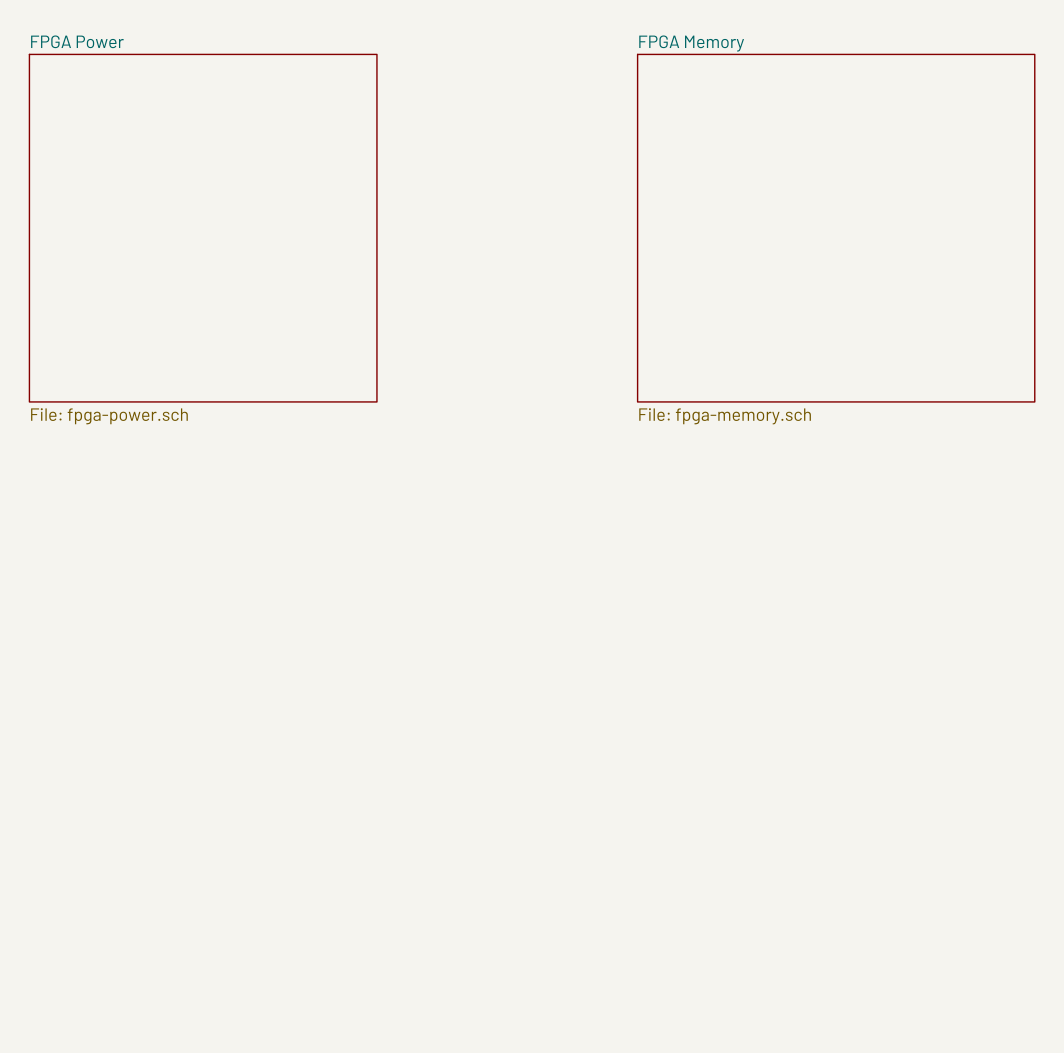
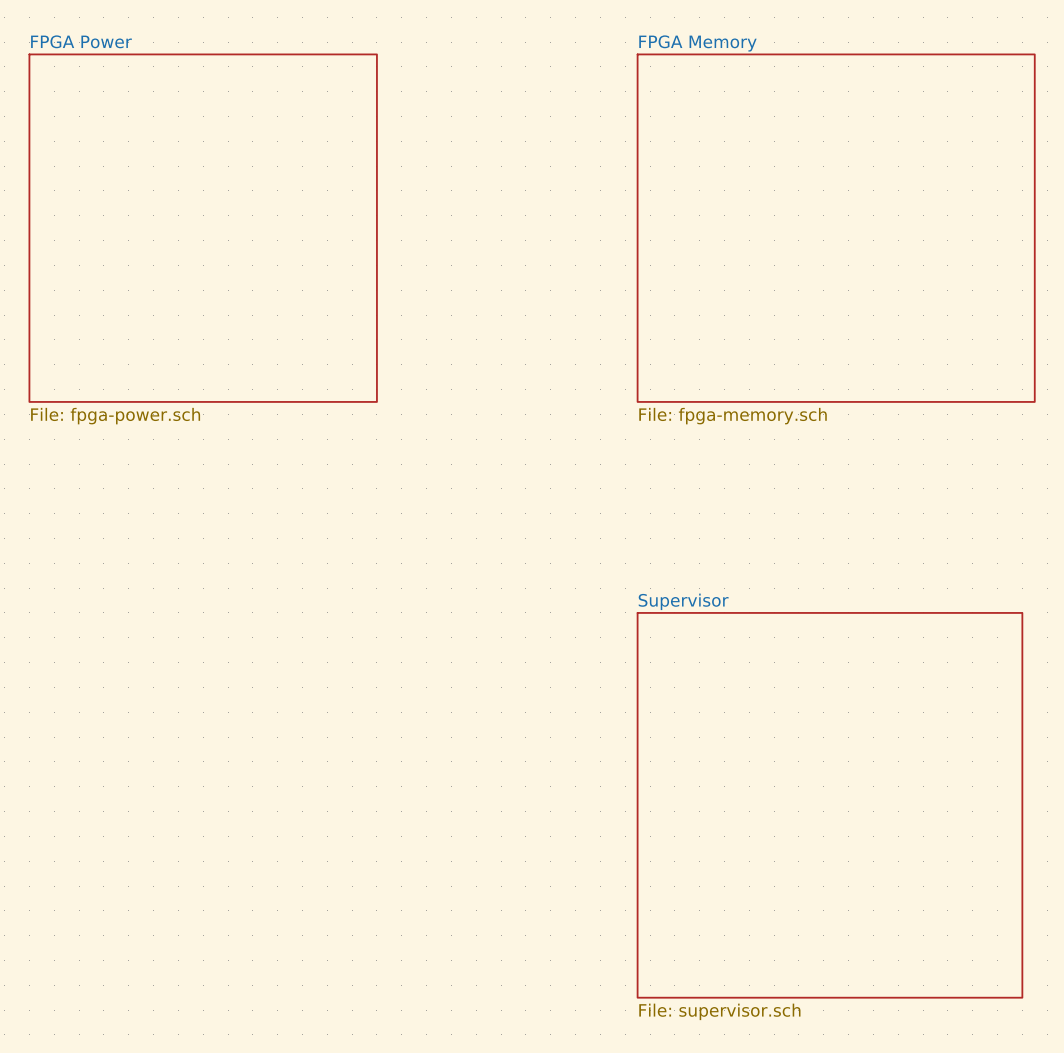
sheet Supervisor: none -> File: supervisor.sch (829, 805)

